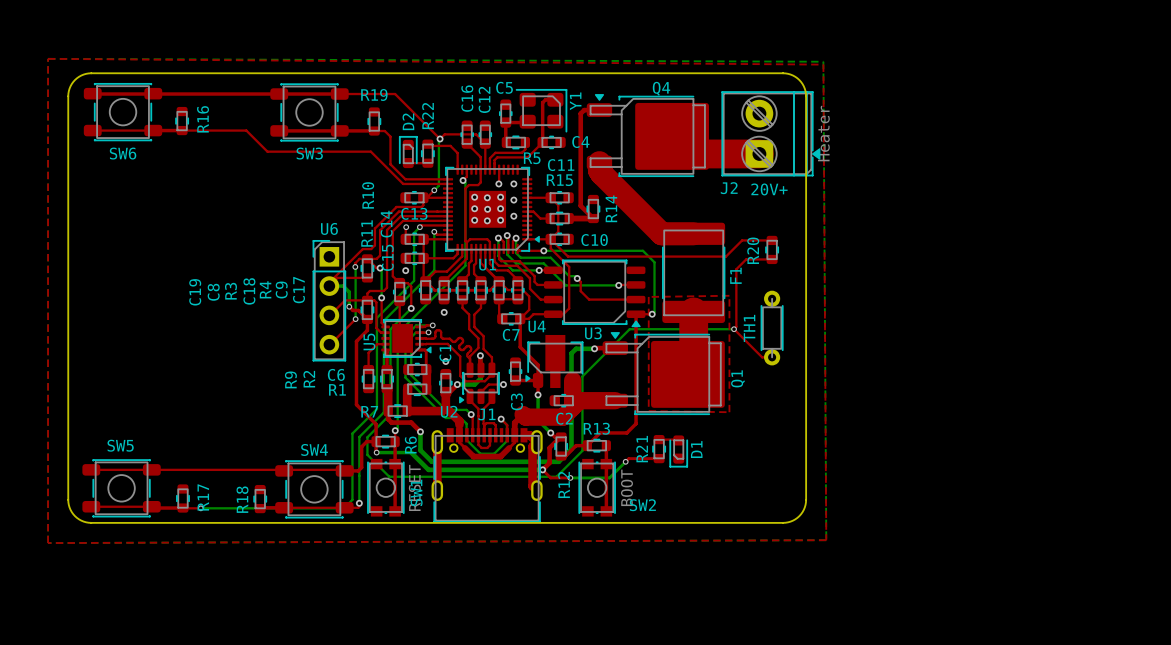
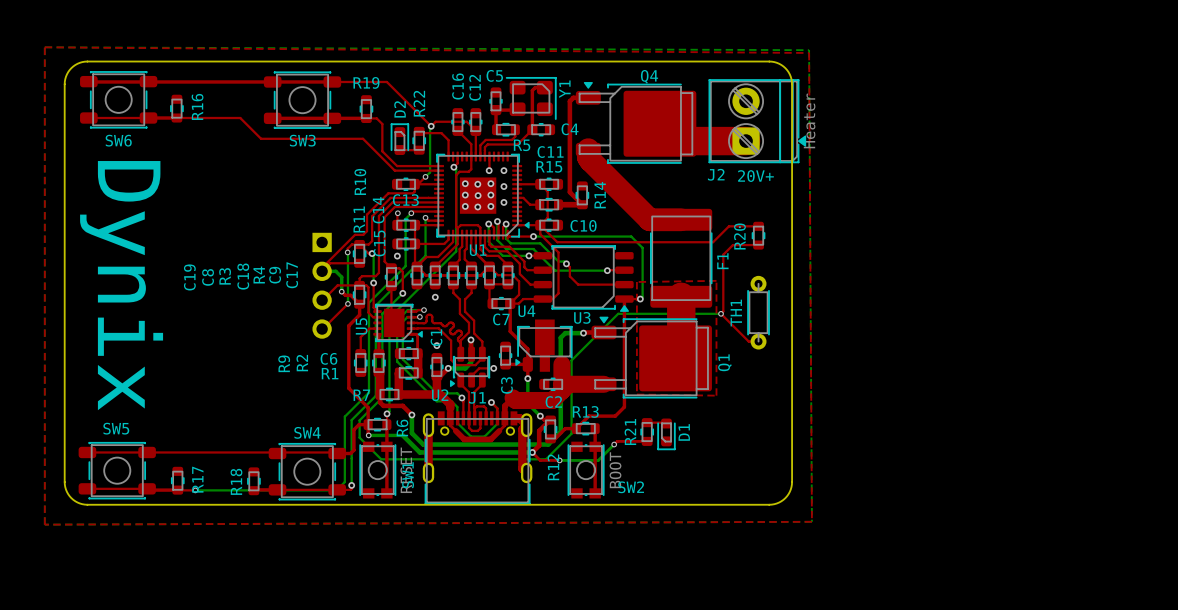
text: none -> Dynix (121, 285)
U6 side: top (329, 300) -> bottom (322, 285)

